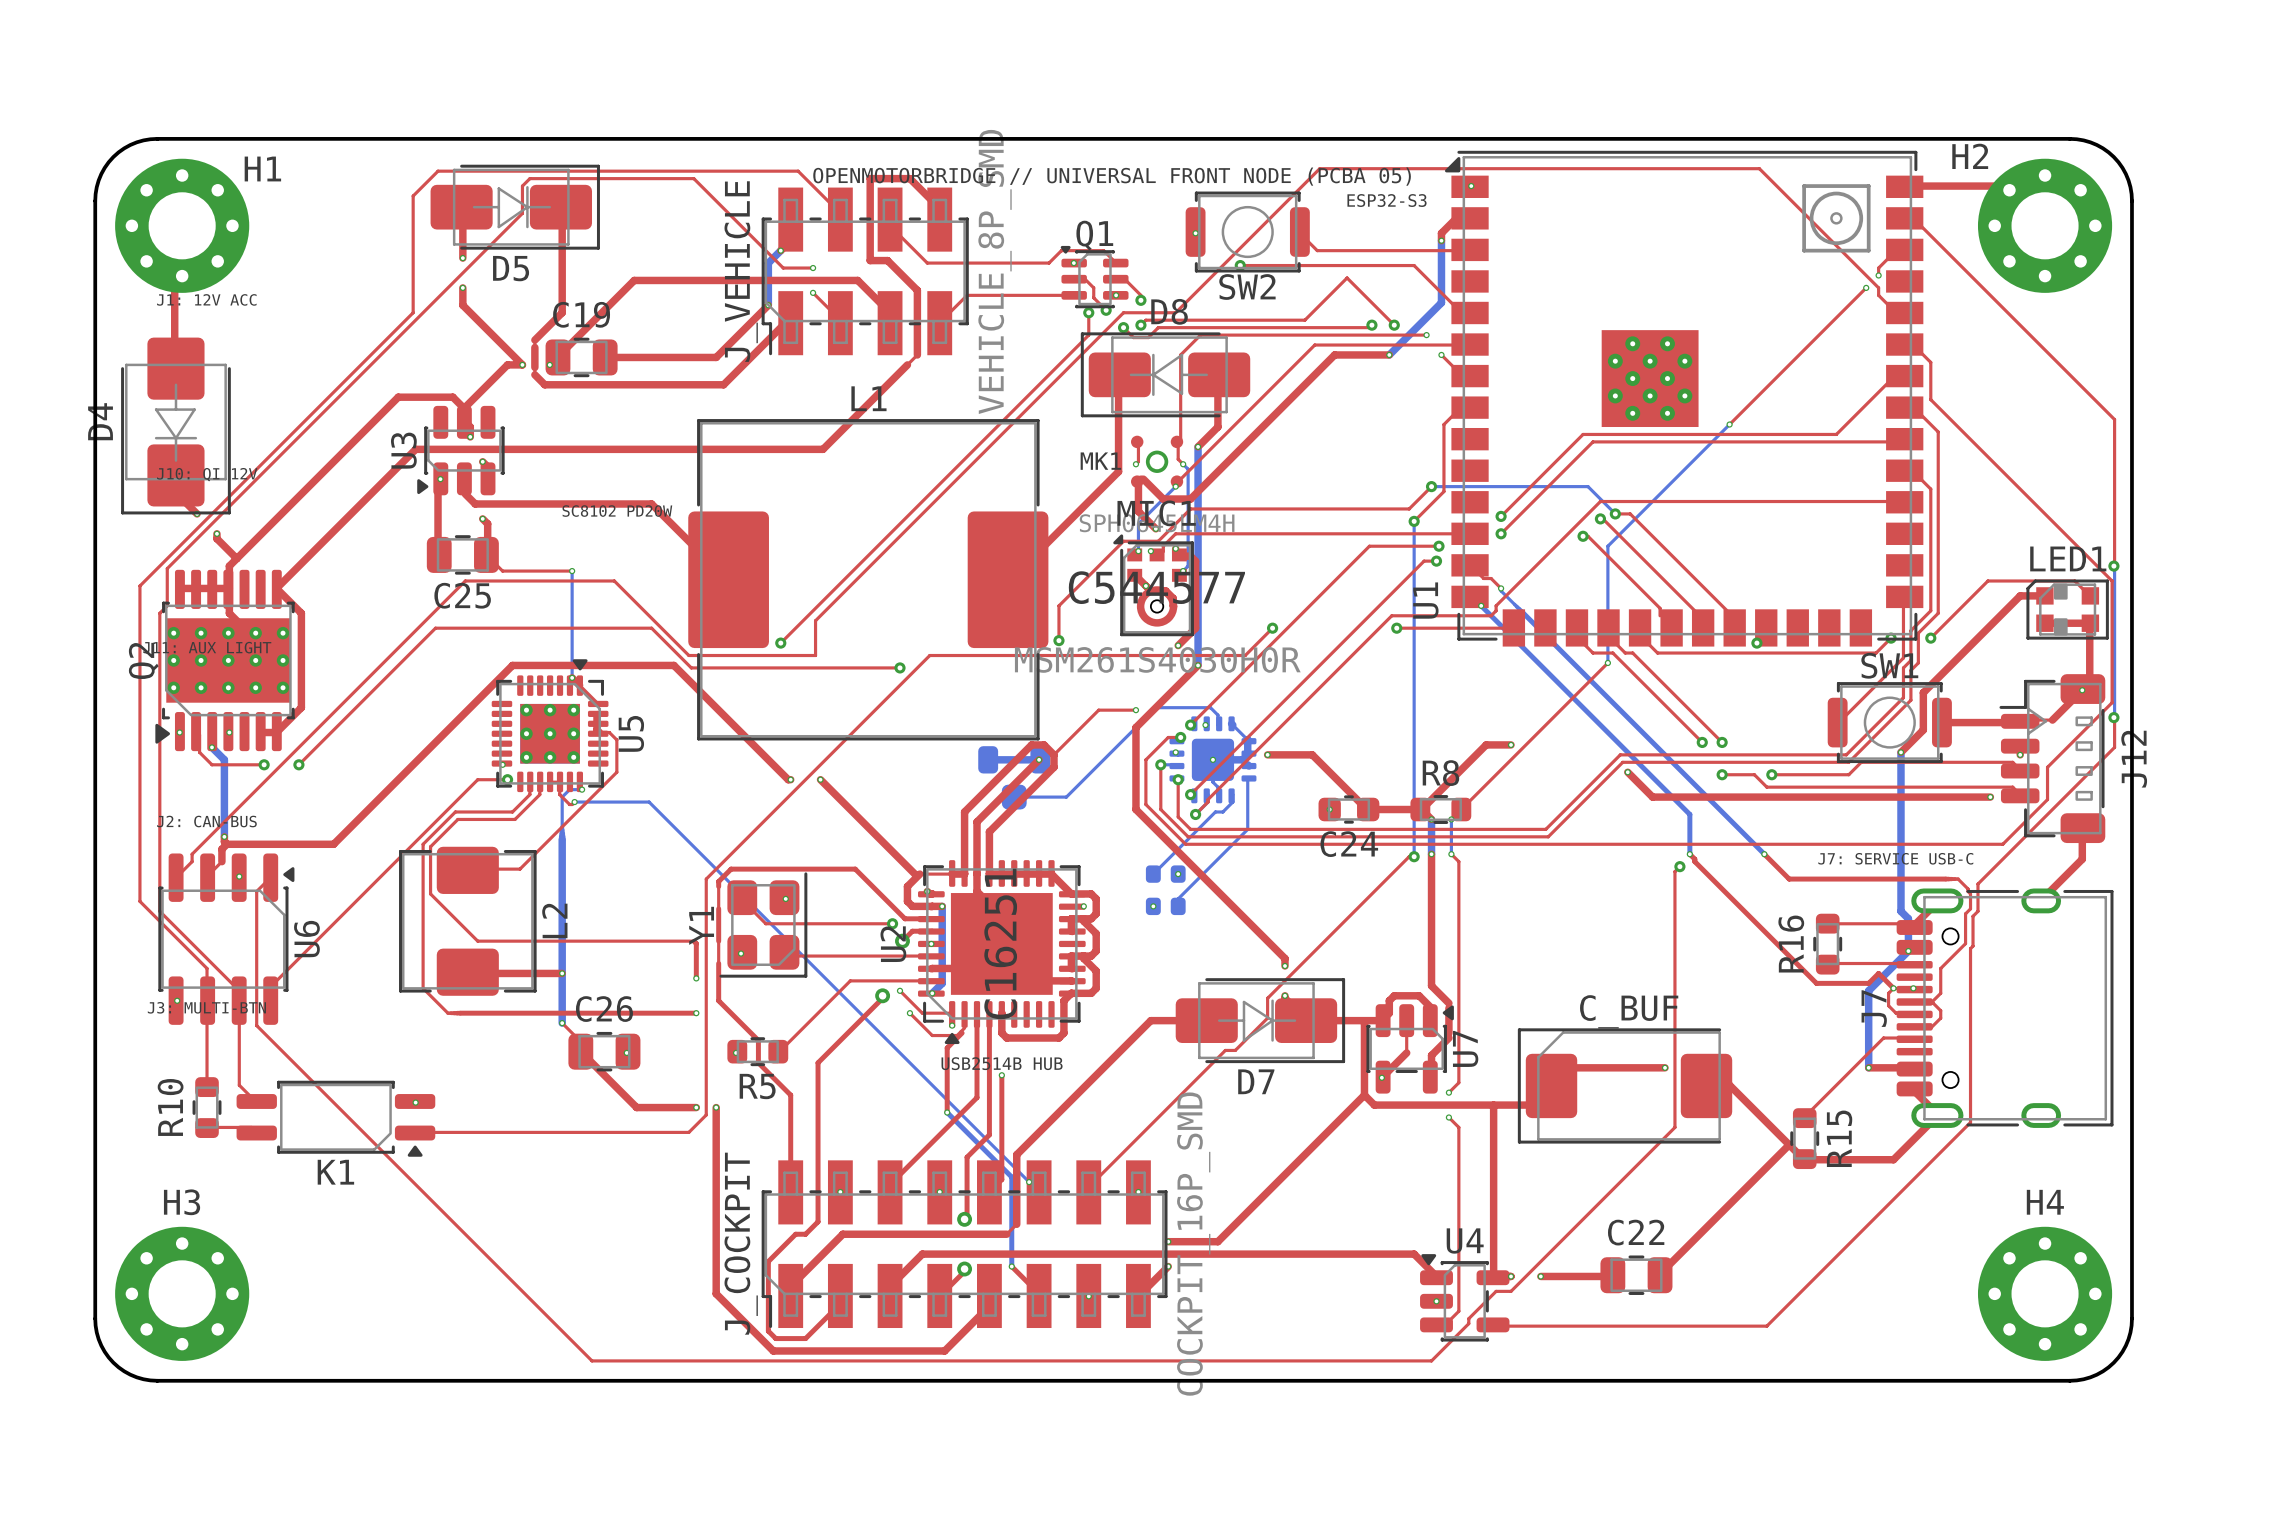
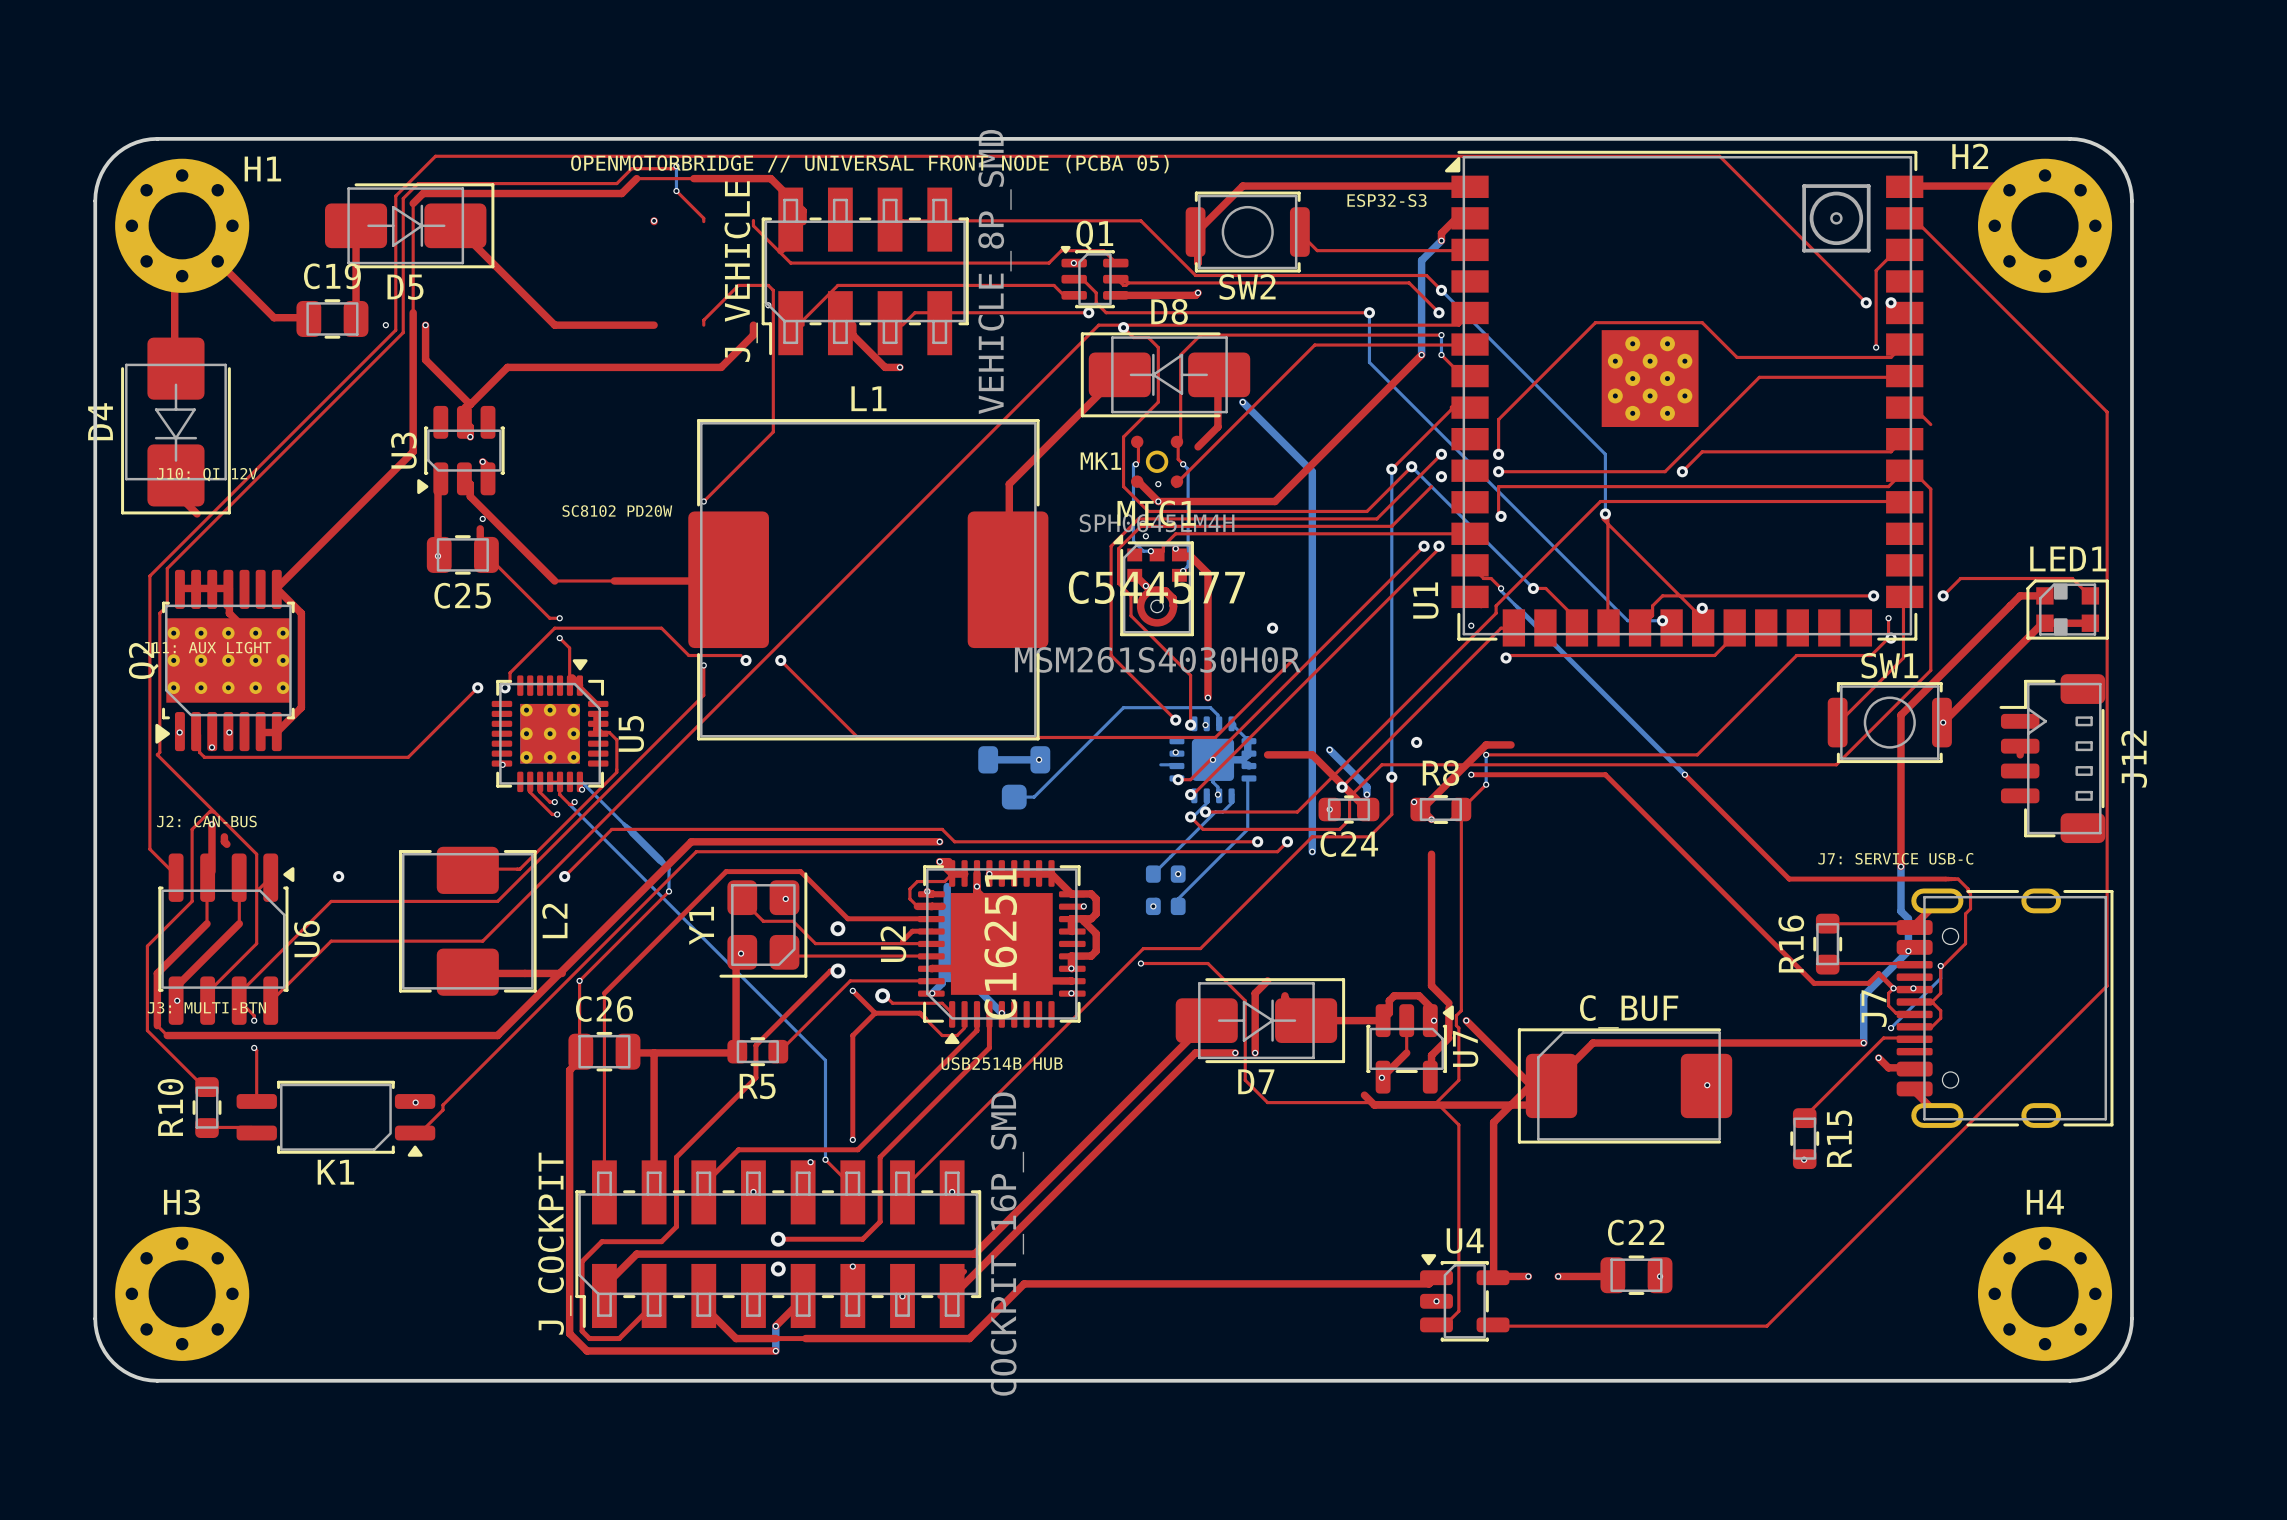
bottom track: none -> (676, 166) (676, 191)
via: none -> (676, 166)
text position: OPENMOTORBRIDGE // UNIVERSAL FRONT NODE (PCBA 05) (1112, 176) -> OPENMOTORBRIDGE // UNIVERSAL FRONT NODE (PCBA 05) (869, 164)
top track: (636, 178) (529, 178) (522, 186) (522, 213) (403, 332) -> (676, 166) (673, 168) (631, 168) (616, 183) (418, 183) (403, 198) (403, 332)
top track: (693, 178) (783, 268) (813, 268) -> (693, 178) (770, 178) (803, 210) (803, 221)
top track: none -> (1471, 186) (1242, 186) (1195, 233) (1198, 235) (1198, 263)
via: (1471, 186) -> none
top track: none -> (676, 191) (703, 218) (703, 221)
via: none -> (676, 191)
top track: (413, 203) (413, 196) (438, 171) (798, 171) (840, 213) (840, 219) -> (413, 203) (423, 193) (621, 193) (636, 178)
top track: (461, 207) (462, 258) -> none
D5 position: (515, 207) -> (409, 225)
top track: (560, 207) (562, 312) (534, 340) (534, 374) (544, 384) (723, 384) (785, 322) (790, 322) -> none
top track: (890, 218) (890, 225) (927, 263) -> (753, 220) (753, 225) (790, 263) (927, 263)
top track: (939, 219) (939, 208) (909, 178) (870, 178) (870, 260) (887, 260) (917, 290) (917, 354) (823, 449) (415, 449) (413, 451) -> none
top track: none -> (654, 220) (654, 221)
via: none -> (654, 220)
top track: none -> (902, 221) (1140, 220) (1195, 275) (1426, 275) (1441, 290)
top track: none -> (356, 225) (356, 318)
top track: none -> (455, 225) (554, 325) (654, 325)
via: (1195, 233) -> none
bottom track: (1441, 240) (1441, 302) (1389, 354) -> (1441, 240) (1421, 260) (1421, 354)
bottom track: (780, 250) (768, 263) (768, 305) -> none
via: (780, 250) -> none
via: (462, 258) -> none
top track: none -> (216, 260) (274, 317) (308, 318)
top track: (1240, 265) (1414, 265) (1461, 312) (1471, 312) -> (1088, 335) (1098, 325) (1458, 325) (1471, 312)
via: (1240, 265) -> none
via: (813, 268) -> none
top track: (1878, 268) (1878, 275) -> (1878, 268) (1876, 270) (1876, 347)
via: (1878, 275) -> none
top track: (1073, 277) (1083, 277) (1093, 287) (1093, 297) (1106, 310) -> none
top track: (1116, 277) (1123, 277) (1140, 295) (1140, 300) -> (1116, 277) (1123, 285) (1128, 282) (1409, 282) (1438, 312)
top track: (462, 287) (462, 305) (522, 364) (507, 364) (465, 407) (462, 407) (452, 397) (398, 397) (229, 566) (229, 588) -> none
via: (462, 287) -> none
top track: (1866, 287) (1729, 424) -> none
via: (1866, 287) -> none
bottom track: none -> (1441, 290) (1605, 454) (1605, 513)
via: none -> (1441, 290)
top track: (813, 292) (840, 320) (840, 322) -> none
via: (813, 292) -> none
top track: none -> (1198, 292) (1195, 295) (1116, 295)
via: none -> (1198, 292)
top track: (1063, 295) (967, 295) (939, 322) -> (1063, 295) (1053, 285) (837, 285) (803, 320) (803, 325)
via: (1116, 295) -> none
text: J1: 12V ACC (206, 299) -> none
via: (1140, 300) -> none
top track: none -> (1866, 302) (1719, 156) (435, 156) (395, 196) (395, 330)
via: none -> (1866, 302)
via: none -> (1891, 302)
top track: (768, 305) (716, 357) (604, 357) -> none
via: (1106, 310) -> none
top track: (413, 312) (395, 330) -> (413, 312) (413, 451)
top track: (1088, 312) (1088, 335) -> (1088, 312) (914, 312) (902, 325)
top track: (1123, 312) (815, 620) (815, 655) (741, 655) -> (1123, 312) (1106, 312) (1096, 302) (1096, 292) (1085, 281)
top track: (1175, 312) (1319, 168) (1759, 168) (1878, 287) (1878, 295) (1896, 312) (1900, 312) -> (1175, 312) (1369, 312)
bottom track: none -> (1369, 312) (1369, 362) (1627, 620) (1662, 620)
via: none -> (1438, 312)
top track: (890, 322) (890, 312) (857, 280) (634, 280) (549, 364) -> none
via: none -> (385, 325)
top track: none -> (425, 325) (425, 359) (470, 404) (507, 367) (721, 367) (753, 335) (753, 325)
via: none -> (425, 325)
top track: none -> (703, 325) (703, 320) (738, 285) (768, 285) (773, 290) (773, 431) (703, 501)
top track: none -> (852, 325) (852, 335) (885, 367) (900, 367)
top track: (1140, 325) (1145, 320) (1304, 320) (1347, 277) (1394, 325) -> none
via: (1140, 325) -> none
top track: (1371, 325) (1369, 327) (1158, 327) (1148, 337) -> (1411, 466) (1366, 511) (1148, 511) (1123, 486) (1123, 436) (1158, 402) (1158, 347) (1148, 337)
via position: (1371, 325) -> (1369, 312)
via: (1394, 325) -> none
top track: none -> (1426, 335) (1441, 335)
via: (1426, 335) -> none
bottom track: none -> (1441, 335) (1441, 354)
via: none -> (1441, 335)
top track: (1903, 345) (1913, 345) (1930, 362) (1930, 399) (2112, 580) (2112, 702) (2047, 767) (2047, 799) (2002, 844) (1185, 844) (1145, 804) (1145, 759) (1168, 737) -> (1903, 345) (1891, 357) (1737, 357) (1702, 322) (1595, 322) (1498, 419) (1498, 454)
via: none -> (1876, 347)
top track: (1389, 354) (1334, 354) (1190, 499) (1163, 499) (1143, 479) -> none
via: (1389, 354) -> none
top track: none -> (1421, 354) (1275, 501) (1158, 501) (1138, 481)
via: none -> (1421, 354)
C19 position: (581, 357) -> (332, 318)
via: (522, 364) -> none
via: (549, 364) -> none
via: none -> (900, 367)
top track: (1118, 374) (1118, 471) (1009, 580) -> (1118, 374) (1009, 484) (1009, 580)
top track: (1893, 377) (1836, 434) (1583, 434) (1501, 516) -> (1893, 377) (1759, 377) (1665, 471) (1498, 471)
bottom track: none -> (1242, 402) (1312, 471) (1312, 851)
via: none -> (1242, 402)
top track: (1461, 407) (1443, 424) (1443, 491) (1414, 521) -> (1461, 407) (1451, 407) (1451, 409) (1391, 469)
top track: (2107, 412) (2114, 419) (2114, 566) -> none
bottom track: (1729, 424) (1607, 546) (1607, 662) -> none
via: (1729, 424) -> none
top track: (1930, 424) (1938, 431) (1938, 613) (1918, 633) (1918, 662) (1910, 670) (1910, 700) (1848, 762) (1622, 762) (1548, 836) (1369, 836) -> (1391, 777) (1391, 814) (1369, 836)
top track: (1900, 441) (1592, 441) (1501, 533) -> (1900, 441) (1891, 451) (1702, 451) (1682, 471)
bottom track: (1198, 446) (1198, 665) -> none
via: (1198, 446) -> none
top track: none -> (1441, 454) (1376, 518) (1138, 518) (1111, 546) (1111, 655) (1175, 720)
via: none -> (1441, 454)
via: none -> (1498, 454)
bottom track: none -> (1133, 464) (1133, 541) (1143, 551) (1150, 551)
bottom track: none -> (1411, 466) (1533, 588)
via: none -> (1411, 466)
bottom track: none -> (1391, 469) (1391, 777)
via: none -> (1391, 469)
via: none -> (1498, 471)
via: none -> (1682, 471)
top track: none -> (1903, 471) (1888, 486) (1498, 486) (1498, 511)
via: (440, 479) -> none
top track: (465, 479) (465, 494) (475, 504) (651, 504) (728, 580) -> (465, 479) (470, 484) (470, 496) (554, 580)
top track: (1140, 479) (1138, 481) (1138, 511) (1155, 528) -> none
via: none -> (1158, 484)
bottom track: (1175, 486) (1138, 523) (1138, 551) -> none
via: (1175, 486) -> none
bottom track: (1431, 486) (1588, 486) (1615, 513) -> none
via position: (1431, 486) -> (1441, 476)
via: none -> (703, 501)
via: none -> (1158, 501)
top track: (1409, 508) (1190, 508) (1158, 541) (1123, 541) (1058, 605) (1058, 640) -> (1409, 508) (1391, 526) (1140, 526) (1118, 548) (1118, 583) (1130, 595) (1130, 615) (1190, 675) (1190, 722)
via: (197, 513) -> none
via: none -> (1605, 513)
top track: (1615, 513) (1630, 513) (1734, 618) (1734, 628) -> (1506, 657) (1508, 655) (1714, 655) (1734, 635) (1734, 628)
via: (1615, 513) -> none
top track: (482, 518) (487, 523) (487, 556) -> none
via: (1600, 518) -> none
bottom track: (1414, 521) (1414, 856) -> none
via: (1414, 521) -> none
top track: none -> (480, 528) (480, 536)
via: (1155, 528) -> none
top track: (216, 533) (216, 538) (236, 558) -> none
via: (216, 533) -> none
via: (1501, 533) -> none
via: none -> (1145, 536)
top track: (1583, 536) (1588, 536) (1660, 608) (1660, 615) -> none
via: (1583, 536) -> none
top track: none -> (1424, 546) (1190, 779) (1178, 779)
via: none -> (1424, 546)
top track: (1438, 546) (1369, 546) (1190, 725) -> none
via: (1138, 551) -> none
via: none -> (438, 556)
top track: (1195, 561) (1195, 628) (1178, 645) -> (1195, 561) (1207, 573) (1207, 697)
top track: (1436, 561) (1424, 561) (1190, 794) -> (1438, 548) (1193, 794) (1190, 794)
via: (1436, 561) -> none
via: (2113, 566) -> none
bottom track: (2114, 566) (2114, 717) -> none
top track: (502, 571) (572, 571) -> (502, 571) (549, 618) (559, 618)
bottom track: (572, 571) (572, 677) -> none
via: (572, 571) -> none
top track: (149, 576) (139, 585) (139, 901) (207, 968) (207, 993) -> (149, 576) (149, 849) (177, 876)
top track: (554, 580) (465, 580) (192, 854) -> (214, 811) (209, 811) (192, 829) (192, 854)
top track: (614, 580) (661, 628) -> (651, 628) (661, 628)
top track: none -> (614, 580) (728, 580)
top track: (2074, 580) (1987, 580) (1930, 638) -> (2074, 580) (2072, 578) (1960, 578) (1943, 595)
via: none -> (1533, 588)
via: none -> (1873, 595)
via: none -> (1943, 595)
bottom track: (1481, 605) (1689, 814) (1689, 854) -> none
via position: (1481, 605) -> (1471, 625)
via: none -> (1702, 608)
top track: (1496, 610) (1491, 615) (1391, 615) (1207, 799) (1207, 802) (1195, 814) -> (1496, 610) (1496, 613) (1297, 811) (1205, 811)
top track: (1930, 610) (1910, 630) (1910, 660) (1903, 667) (1903, 697) -> (1930, 610) (1930, 670) (1903, 697)
via: none -> (559, 618)
via: none -> (1888, 618)
via: none -> (1662, 620)
top track: (2089, 623) (2089, 682) (2052, 720) (2020, 720) -> none
top track: (554, 628) (435, 628) (298, 764) -> (554, 628) (510, 672) (510, 682) (505, 687)
top track: (651, 628) (691, 667) (900, 667) -> none
top track: (1272, 628) (1245, 655) (929, 655) (706, 879) (706, 1115) (688, 1132) (420, 1132) -> (1287, 841) (1277, 851) (696, 851) (442, 1105) (442, 1110) (420, 1132)
top track: (1396, 628) (1501, 628) -> (1342, 787) (1501, 628)
via: (1396, 628) -> none
top track: (1578, 628) (1578, 638) (1592, 653) (1612, 653) (1702, 742) -> (1578, 628) (1578, 620) (1545, 588) (1533, 588)
top track: (1607, 628) (1607, 635) (1625, 653) (1632, 653) (1722, 742) -> (1607, 628) (1607, 516) (1605, 513)
top track: (1640, 628) (1640, 635) (1657, 653) (1876, 653) (1891, 638) -> (1640, 628) (1652, 615) (1652, 605) (1662, 595) (1873, 595)
top track: none -> (559, 638) (569, 648) (569, 680)
via: none -> (559, 638)
via: (1930, 638) -> none
via: (1058, 640) -> none
via position: (780, 643) -> (780, 660)
via: (1756, 643) -> none
via: (1178, 645) -> none
top track: none -> (1294, 657) (1215, 737) (1180, 737)
via: none -> (1506, 657)
via: none -> (746, 660)
top track: none -> (780, 660) (857, 737) (1168, 737)
top track: (1607, 662) (1486, 784) -> none
via: (1607, 662) -> none
top track: none -> (703, 665) (703, 695) (497, 901) (331, 901) (239, 993) (239, 1000) (254, 1015) (254, 1020)
via: none -> (703, 665)
top track: (1198, 665) (1135, 727) (1135, 809) (1284, 958) (1284, 965) -> none
via: (1198, 665) -> none
via: (900, 667) -> none
via: (572, 677) -> none
via: none -> (477, 687)
via: none -> (505, 687)
via: (2082, 690) -> none
top track: (1923, 692) (1923, 730) (1900, 752) -> (1923, 692) (1900, 715) (1900, 866)
via: none -> (1207, 697)
bottom track: (1155, 707) (1066, 797) (1034, 797) -> (1155, 707) (1123, 707) (1034, 797)
top track: (1135, 710) (1098, 710) (1053, 754) -> none
via: (1135, 710) -> none
via: (2113, 717) -> none
top track: (2114, 717) (2114, 747) (1977, 884) (1977, 911) (1973, 916) (1973, 946) (1970, 948) (1970, 1122) -> (2107, 412) (2107, 985) (1970, 1122)
top track: (2020, 720) (2017, 722) (1943, 722) -> (2045, 623) (2042, 623) (1943, 722)
via: none -> (1943, 722)
via position: (1180, 737) -> (1175, 720)
via: none -> (1416, 742)
via: (1702, 742) -> none
via: (1722, 742) -> none
via: (1511, 744) -> none
bottom track: (211, 747) (224, 759) (224, 836) -> none
bottom track: none -> (1329, 749) (1366, 787) (1366, 794)
via: none -> (1329, 749)
top track: (159, 752) (159, 911) (241, 993) (241, 998) (239, 1000) (239, 1085) (256, 1102) -> (159, 752) (157, 754) (256, 854) (256, 891)
bottom track: (1900, 752) (1900, 866) -> none
via: (1900, 752) -> none
top track: (1053, 754) (1044, 744) (1031, 744) (964, 811) (964, 873) -> none
top track: (1053, 754) (1053, 767) (989, 831) (989, 874) -> none
via: (1267, 754) -> none
bottom track: none -> (1486, 754) (1486, 784)
via: none -> (1486, 754)
top track: (1620, 754) (1545, 829) (1339, 829) -> (1620, 754) (1486, 754)
top track: (1697, 754) (1846, 754) -> (1697, 754) (1796, 655) (1871, 655) (1888, 638) (1888, 618)
top track: none -> (1846, 754) (1836, 764) (1381, 764) (1349, 797) (1349, 819) (1339, 829)
via: (2020, 754) -> none
top track: (204, 757) (211, 764) (264, 764) -> (204, 757) (408, 757) (477, 687)
top track: (1039, 759) (977, 821) (977, 873) -> none
via: (264, 764) -> none
via: (298, 764) -> none
top track: (1160, 764) (1160, 809) (1188, 836) (1312, 836) -> (902, 1192) (902, 1189) (1143, 948) (1200, 948) (1312, 836)
via: (1160, 764) -> none
top track: (2020, 771) (2012, 762) (1861, 762) (1848, 774) (1771, 774) -> none
top track: (1627, 772) (1652, 797) (1990, 797) -> none
via: (1627, 772) -> none
via: none -> (1471, 774)
top track: none -> (1684, 774) (1764, 854)
bottom track: (1684, 774) (1764, 854) -> none
via: none -> (1684, 774)
top track: (1722, 774) (1754, 774) (1766, 787) (2012, 787) (2020, 795) -> none
via: (1722, 774) -> none
via: (1771, 774) -> none
via: none -> (1391, 777)
top track: (507, 779) (477, 779) (271, 985) (271, 1000) -> (477, 941) (331, 941) (271, 1000)
via: (507, 779) -> none
top track: (790, 779) (788, 779) (673, 665) (512, 665) (333, 844) (226, 844) (221, 849) (221, 861) (211, 871) -> (211, 824) (211, 871)
via: (790, 779) -> none
top track: (820, 779) (914, 874) (952, 874) -> none
via: (820, 779) -> none
top track: (1178, 779) (1178, 816) (1190, 829) (1203, 829) -> (1190, 816) (1203, 829)
bottom track: none -> (582, 782) (669, 869) (669, 891)
via: none -> (1486, 784)
via: none -> (1342, 787)
bottom track: (582, 789) (569, 789) (562, 797) (562, 1023) -> none
top track: (529, 792) (529, 794) (512, 811) (455, 811) (423, 844) (423, 988) (447, 1013) (696, 1013) -> (529, 792) (552, 814) (557, 814)
top track: (539, 792) (539, 794) (515, 819) (457, 819) (430, 846) (430, 893) (477, 941) -> (539, 792) (549, 802) (554, 802)
via: none -> (1217, 794)
via: none -> (1366, 794)
via: (1990, 797) -> none
via: none -> (554, 802)
bottom track: (574, 802) (649, 802) (1029, 1182) -> none
via: none -> (1414, 802)
bottom track: none -> (569, 804) (825, 1060) (825, 1159)
top track: (1368, 809) (1420, 809) -> none
via: none -> (1205, 811)
via: none -> (557, 814)
via: (1195, 814) -> none
via: none -> (1190, 816)
bottom track: (1431, 819) (1431, 854) -> none
bottom track: (1451, 819) (1451, 854) -> none
via: (1451, 819) -> none
top track: (2082, 828) (2082, 859) (2041, 900) -> none
via position: (224, 836) -> (211, 824)
top track: none -> (939, 841) (691, 841) (497, 1035) (167, 1035) (157, 1025) (157, 973) (207, 923) (207, 876)
via: none -> (939, 841)
top track: none -> (1257, 841) (954, 841) (942, 829) (611, 829) (564, 876)
via: none -> (1257, 841)
via: none -> (1287, 841)
via: none -> (1312, 851)
via: (1431, 854) -> none
top track: (1451, 854) (1458, 861) (1458, 1028) -> (1461, 809) (1461, 1010) (1456, 1015) (1456, 1025) (1458, 1028)
via: (1451, 854) -> none
top track: (1689, 854) (1694, 861) (1816, 983) -> (1471, 774) (1605, 774) (1814, 983) (1816, 983)
via: (1689, 854) -> none
via: (1764, 854) -> none
top track: (1414, 856) (1409, 856) (1267, 998) (1267, 1018) (1235, 1050) (1225, 1050) (1088, 1187) (1088, 1192) -> none
via: (1414, 856) -> none
top track: (192, 861) (177, 876) -> none
via: none -> (939, 861)
top track: (1679, 866) (1674, 871) (1674, 1127) (1511, 1291) (1496, 1291) (1468, 1318) (1468, 1323) (1431, 1360) (592, 1360) (256, 1025) (256, 943) -> (207, 993) (256, 943)
via: (1679, 866) -> none
via: none -> (1900, 866)
top track: (919, 874) (907, 886) (907, 901) (912, 906) (917, 906) -> (949, 861) (939, 861) (952, 874) (944, 881) (917, 881) (909, 888) (909, 898) (917, 906)
via: none -> (989, 874)
top track: none -> (239, 876) (239, 923) (177, 985) (177, 1000)
via: (239, 876) -> none
via: none -> (338, 876)
via: none -> (564, 876)
bottom track: none -> (947, 886) (947, 978) (967, 978) (1001, 1013)
via: none -> (977, 886)
via: none -> (669, 891)
via: (942, 906) -> none
top track: (904, 918) (855, 869) (731, 869) (718, 881) (718, 1000) (758, 1040) (758, 1062) (790, 1095) (790, 1192) -> (904, 918) (847, 918) (800, 871) (726, 871) (604, 993) (604, 1192)
top track: (763, 921) (765, 923) (892, 923) -> (763, 921) (793, 921) (815, 943) (931, 943)
via: (892, 923) -> none
via: none -> (837, 928)
top track: (482, 941) (693, 941) -> (482, 941) (780, 643)
top track: (694, 941) (696, 943) (696, 978) -> none
via: (902, 941) -> none
via: (931, 943) -> none
top track: none -> (741, 953) (736, 958) (736, 1052) (626, 1052)
top track: (1083, 956) (1083, 958) (1096, 970) (1096, 988) (1091, 993) (1071, 993) -> none
top track: none -> (1140, 963) (1207, 963) (1245, 1000) (1245, 1080) (1267, 1102) (1436, 1102)
via: none -> (1140, 963)
via: (1284, 965) -> none
bottom track: none -> (1940, 965) (1940, 978) (1891, 1028)
via: none -> (1940, 965)
via: none -> (1071, 968)
top track: none -> (837, 970) (830, 970) (755, 1045) (755, 1077) (676, 1157) (676, 1226) (661, 1241) (601, 1241) (582, 1261) (582, 1331) (589, 1338) (619, 1338) (654, 1303) (654, 1296)
via: none -> (837, 970)
via position: (562, 973) -> (579, 980)
via: (696, 978) -> none
top track: none -> (1267, 980) (1255, 993) (1255, 1052)
top track: none -> (852, 990) (875, 1013)
via: none -> (852, 990)
top track: none -> (880, 990) (892, 1003) (942, 1003) (952, 1013)
via: (900, 990) -> none
bottom track: (1868, 990) (1868, 1067) -> (1868, 990) (1863, 995) (1863, 1042)
top track: (900, 991) (922, 1013) (952, 1013) (952, 1025) -> none
top track: (1071, 993) (1063, 1000) (1063, 1033) (1058, 1038) (1006, 1038) (1001, 1033) (1001, 1013) -> none
via: none -> (1071, 993)
via: (1284, 995) -> none
top track: (882, 998) (818, 1062) (818, 1221) (805, 1234) (795, 1234) (768, 1261) (768, 1331) (775, 1338) -> (703, 1296) (703, 1306) (736, 1338) (775, 1338)
top track: (207, 1000) (207, 1087) -> (192, 861) (192, 901) (147, 946) (147, 1030) (204, 1087) (207, 1087)
via: (696, 1013) -> none
top track: none -> (875, 1013) (852, 1035) (852, 1139)
top track: (909, 1013) (932, 1035) (942, 1035) -> (875, 1013) (919, 1013) (942, 1035)
via: (909, 1013) -> none
via: none -> (1001, 1013)
via: none -> (254, 1020)
top track: (1206, 1020) (1150, 1020) (1016, 1154) (1016, 1224) (1006, 1234) (842, 1234) (790, 1286) (790, 1296) -> none
top track: none -> (1207, 1020) (974, 1254)
top track: (1364, 1020) (1364, 1095) (1217, 1241) (1168, 1241) -> none
via: none -> (1434, 1020)
via: none -> (1466, 1020)
top track: (562, 1023) (579, 1040) -> (669, 891) (579, 980) (579, 1040)
via: (562, 1023) -> none
via: (952, 1025) -> none
via: none -> (1891, 1028)
top track: (977, 1030) (977, 1097) (890, 1184) (890, 1192) -> (977, 1030) (857, 1149) (738, 1149) (703, 1184) (703, 1192)
top track: (960, 1031) (962, 1033) (947, 1047) (947, 1112) -> none
via: none -> (1863, 1042)
top track: none -> (254, 1047) (256, 1050) (256, 1102)
via: none -> (254, 1047)
top track: (989, 1047) (989, 1134) (967, 1157) (967, 1216) -> (989, 1047) (880, 1157) (880, 1221) (862, 1239) (778, 1239)
top track: (582, 1052) (636, 1107) (696, 1107) -> none
via: (626, 1052) -> none
top track: none -> (654, 1052) (654, 1192)
via: (736, 1052) -> none
top track: none -> (1235, 1052) (1195, 1052) (952, 1296)
via: none -> (1235, 1052)
via: none -> (1255, 1052)
via: none -> (1878, 1057)
top track: (1568, 1067) (1665, 1067) -> (1568, 1067) (1592, 1042) (1863, 1042)
via position: (1665, 1067) -> (1707, 1085)
top track: (1868, 1067) (1888, 1067) -> (1878, 1057) (1888, 1067)
via: (1868, 1067) -> none
top track: (1001, 1075) (1001, 1179) (989, 1192) -> none
via: (1001, 1075) -> none
top track: (1458, 1080) (1458, 1082) (1448, 1092) -> (1458, 1080) (1436, 1102)
top track: (1707, 1085) (1729, 1085) (1804, 1159) (1893, 1159) (1938, 1115) -> none
via: (1448, 1092) -> none
top track: (1493, 1105) (1493, 1122) -> (1466, 1020) (1530, 1085) (1493, 1122)
via: (696, 1107) -> none
top track: (716, 1107) (716, 1293) (773, 1350) -> (582, 1052) (582, 1057) (569, 1070) (569, 1333) (587, 1350) (773, 1350)
via: (716, 1107) -> none
bottom track: (947, 1112) (1011, 1177) (1011, 1266) -> none
via: (947, 1112) -> none
top track: (1448, 1117) (1458, 1127) -> (1436, 1102) (1458, 1124) (1458, 1127)
via: (1448, 1117) -> none
via: none -> (852, 1139)
top track: (1789, 1144) (1660, 1275) -> none
top track: none -> (825, 1159) (852, 1187) (852, 1192)
via: none -> (825, 1159)
via: none -> (1804, 1159)
via: none -> (810, 1162)
via: (1029, 1182) -> none
via: none -> (753, 1192)
via: (840, 1192) -> none
via position: (939, 1192) -> (952, 1192)
via: (1138, 1192) -> none
via: (964, 1219) -> none
via: none -> (778, 1239)
via: (1168, 1241) -> none
J_COCKPIT position: (964, 1244) -> (778, 1244)
top track: (922, 1254) (890, 1286) (890, 1296) -> (922, 1254) (636, 1254) (604, 1286) (604, 1296)
top track: (974, 1254) (1414, 1254) (1436, 1276) -> (805, 1338) (969, 1338) (1024, 1283) (1429, 1283) (1436, 1276)
via: none -> (852, 1266)
top track: (1011, 1266) (1039, 1293) (1039, 1296) -> none
via: (1011, 1266) -> none
top track: (1168, 1266) (1138, 1296) -> none
via: (1168, 1266) -> none
via: none -> (778, 1269)
via: (964, 1269) -> none
via: (1511, 1276) -> none
via: none -> (1528, 1276)
top track: (1540, 1276) (1558, 1276) -> (1511, 1276) (1528, 1276)
via: (1540, 1276) -> none
via: none -> (1558, 1276)
via: none -> (1660, 1276)
top track: none -> (803, 1296) (803, 1298) (775, 1326)
top track: (840, 1296) (840, 1303) (805, 1338) -> none
via: none -> (902, 1296)
top track: (989, 1296) (989, 1306) (944, 1350) (775, 1350) -> none
via: (1088, 1296) -> none
bottom track: none -> (775, 1326) (775, 1350)
via: none -> (775, 1326)
via: none -> (775, 1350)

